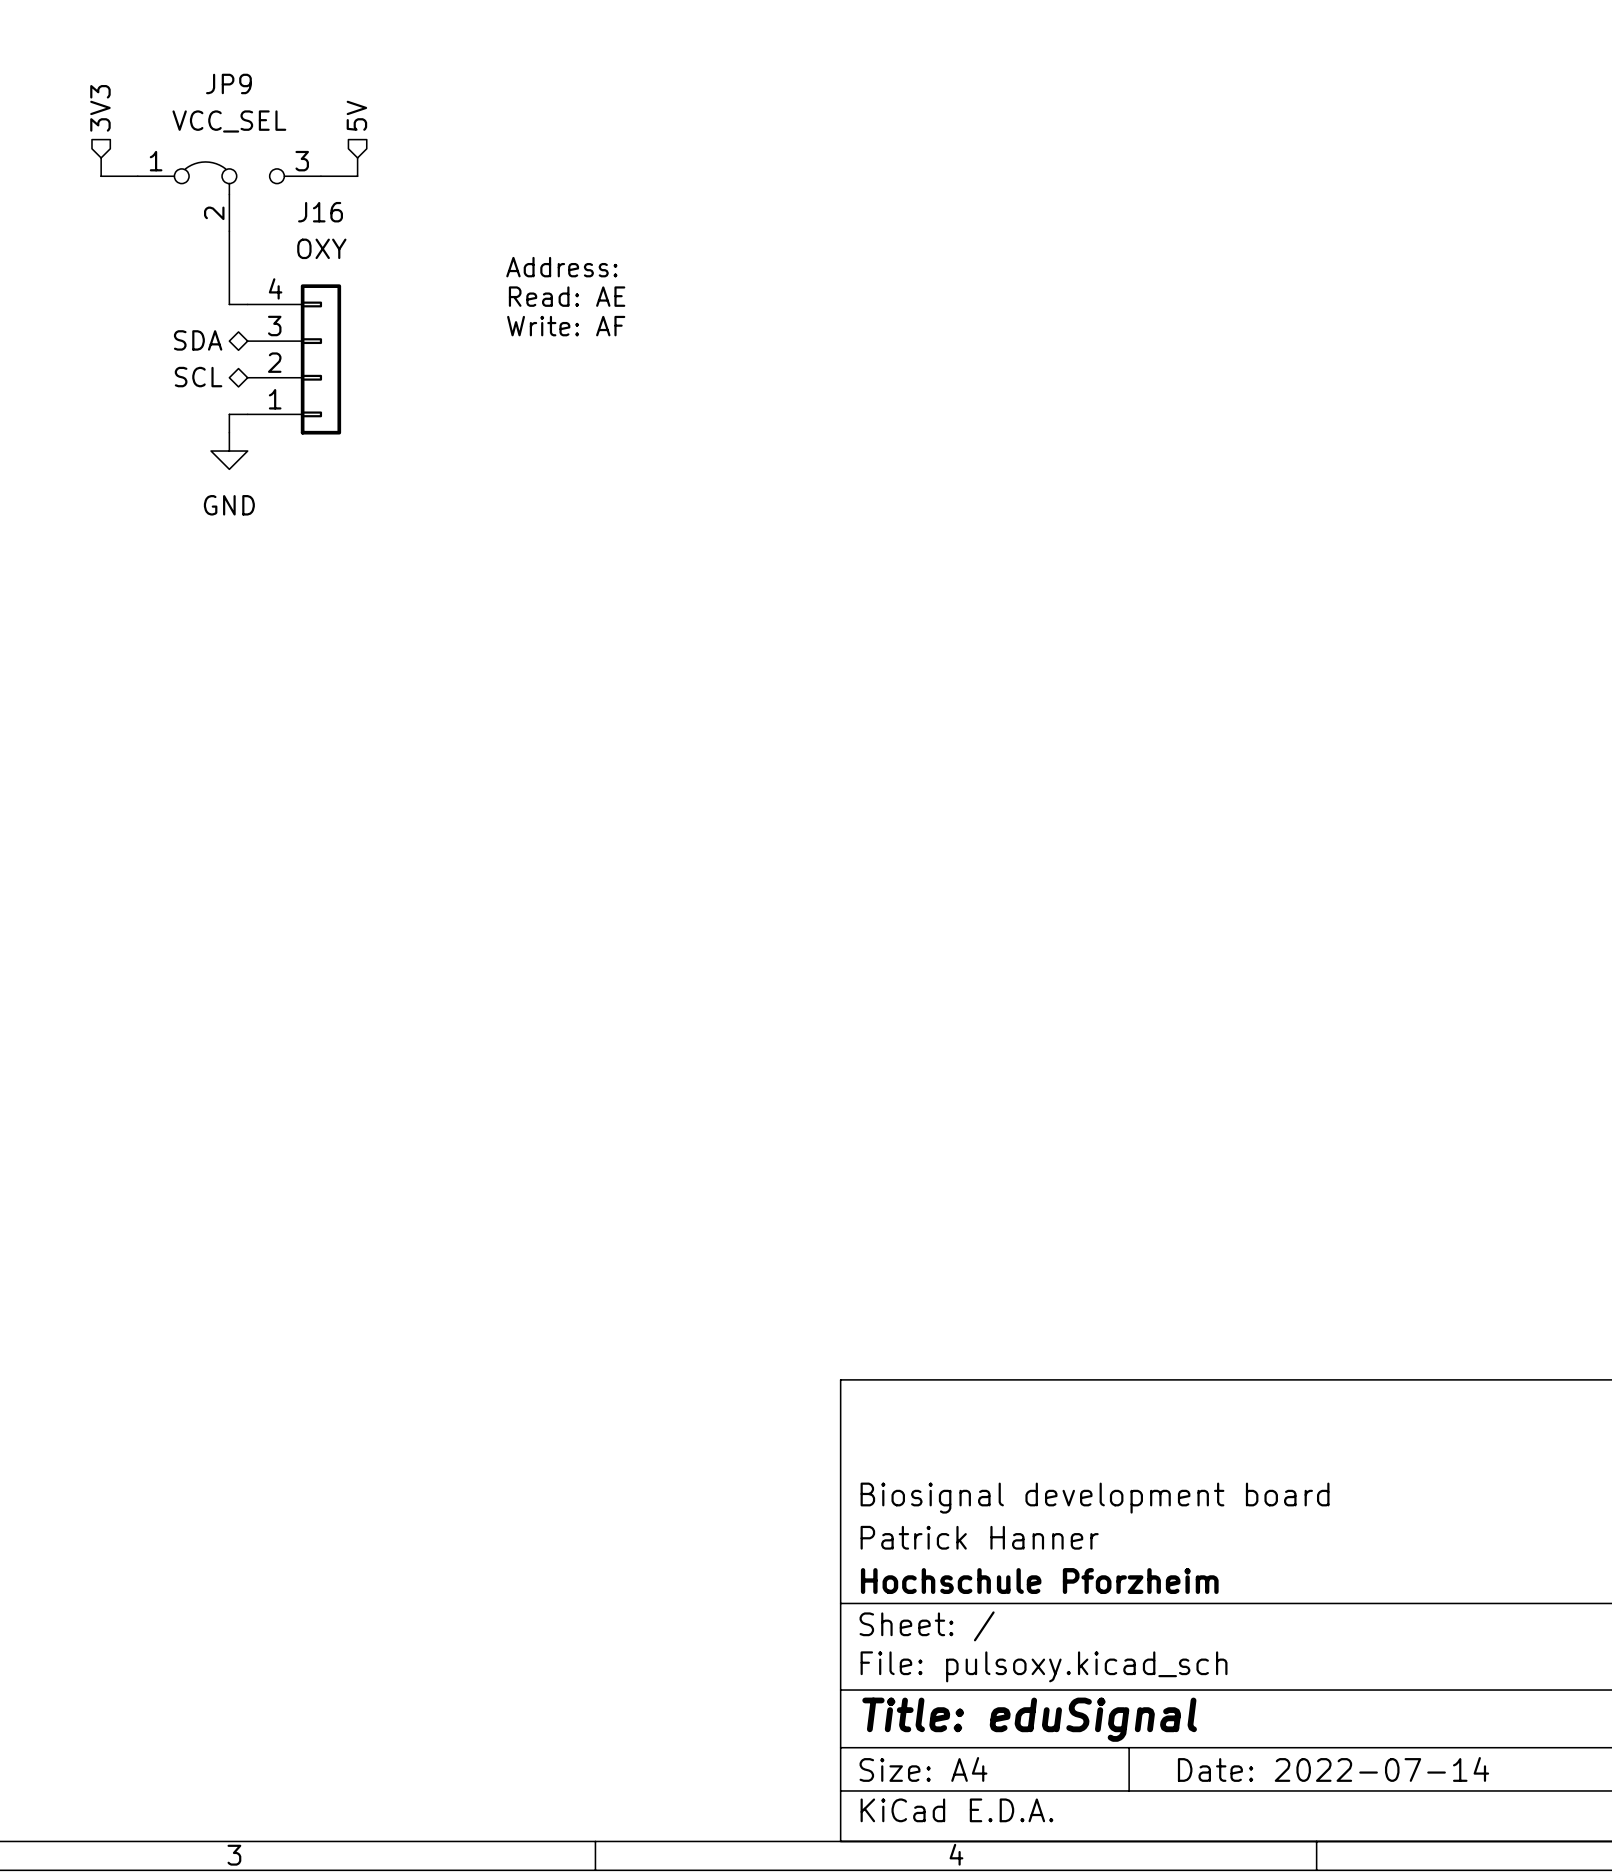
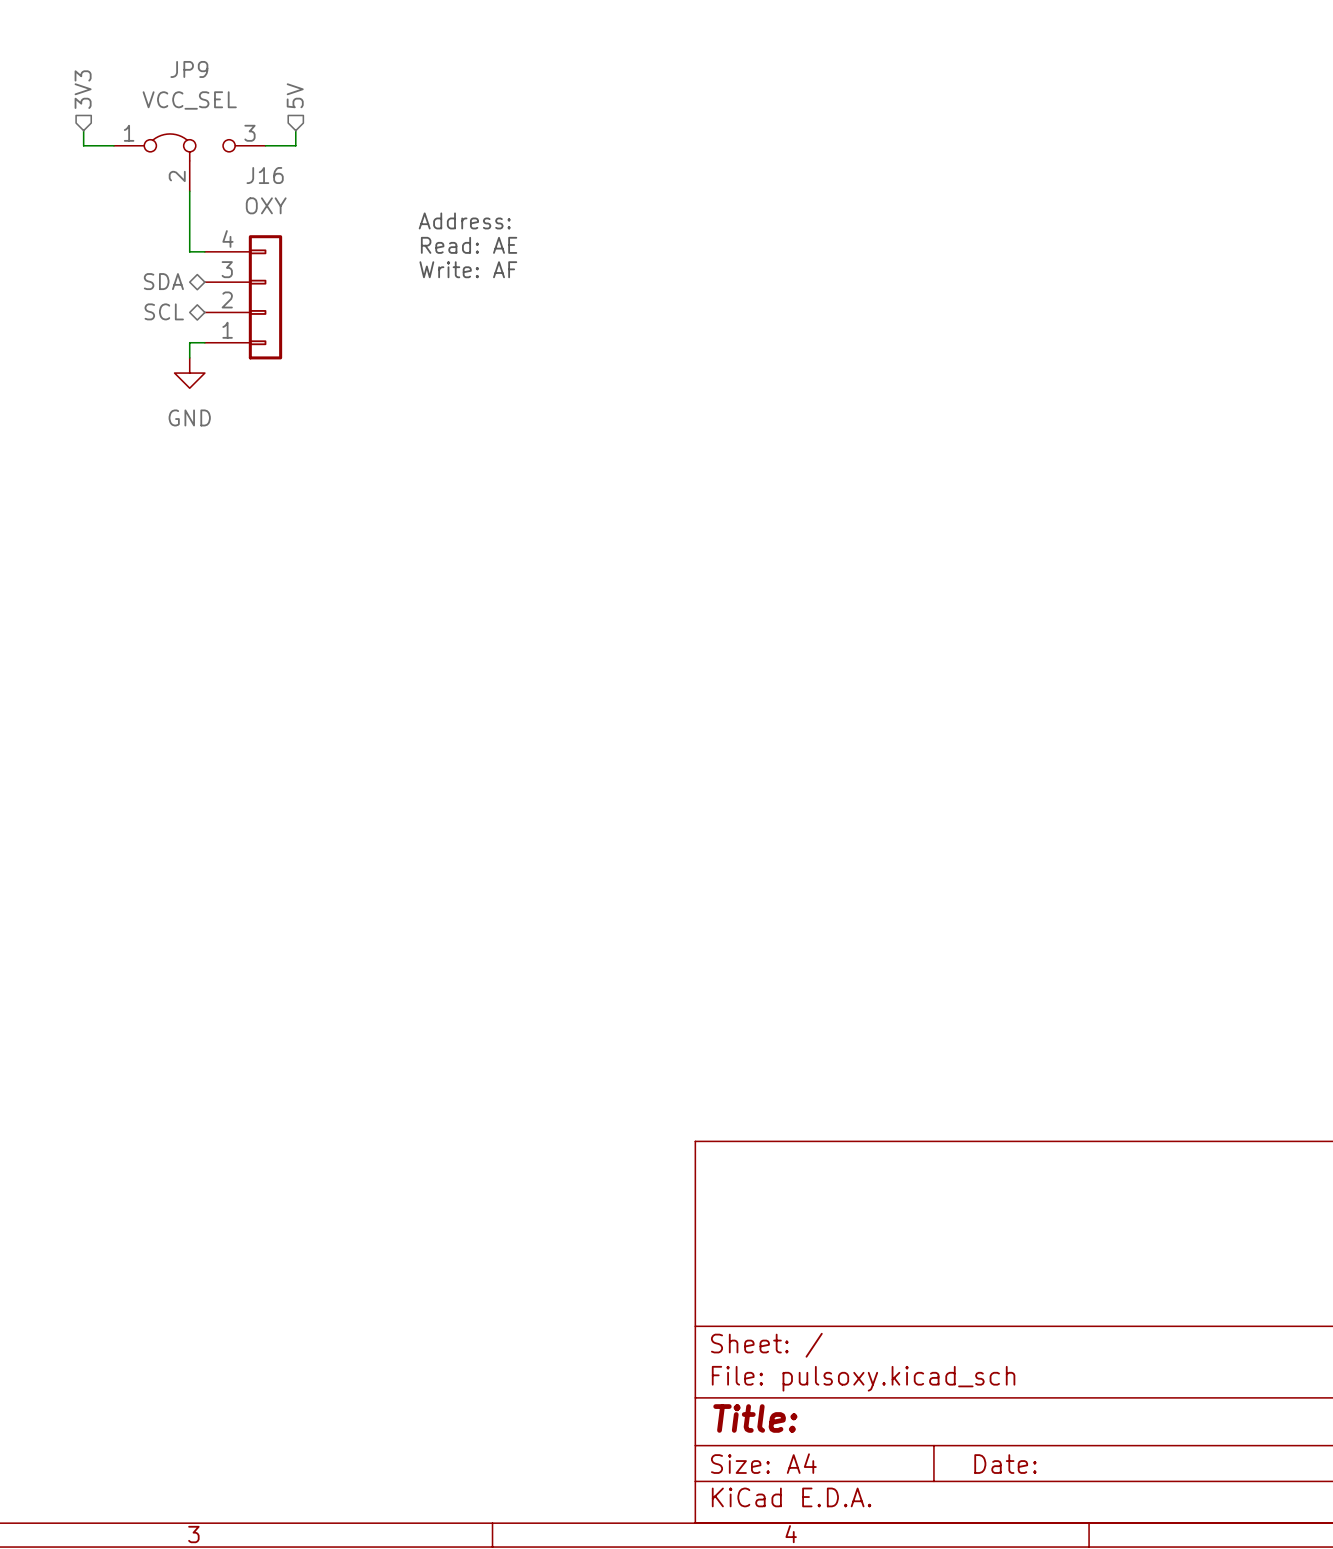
title block: Biosignal development board (1095, 1498) -> none
title block: Patrick Hanner (979, 1537) -> none
title block: Hochschule Pforzheim (1039, 1581) -> none
title block: Title: eduSignal (1029, 1719) -> Title: (755, 1418)
title block: Date: 2022-07-14 (1333, 1769) -> Date: (1005, 1464)

